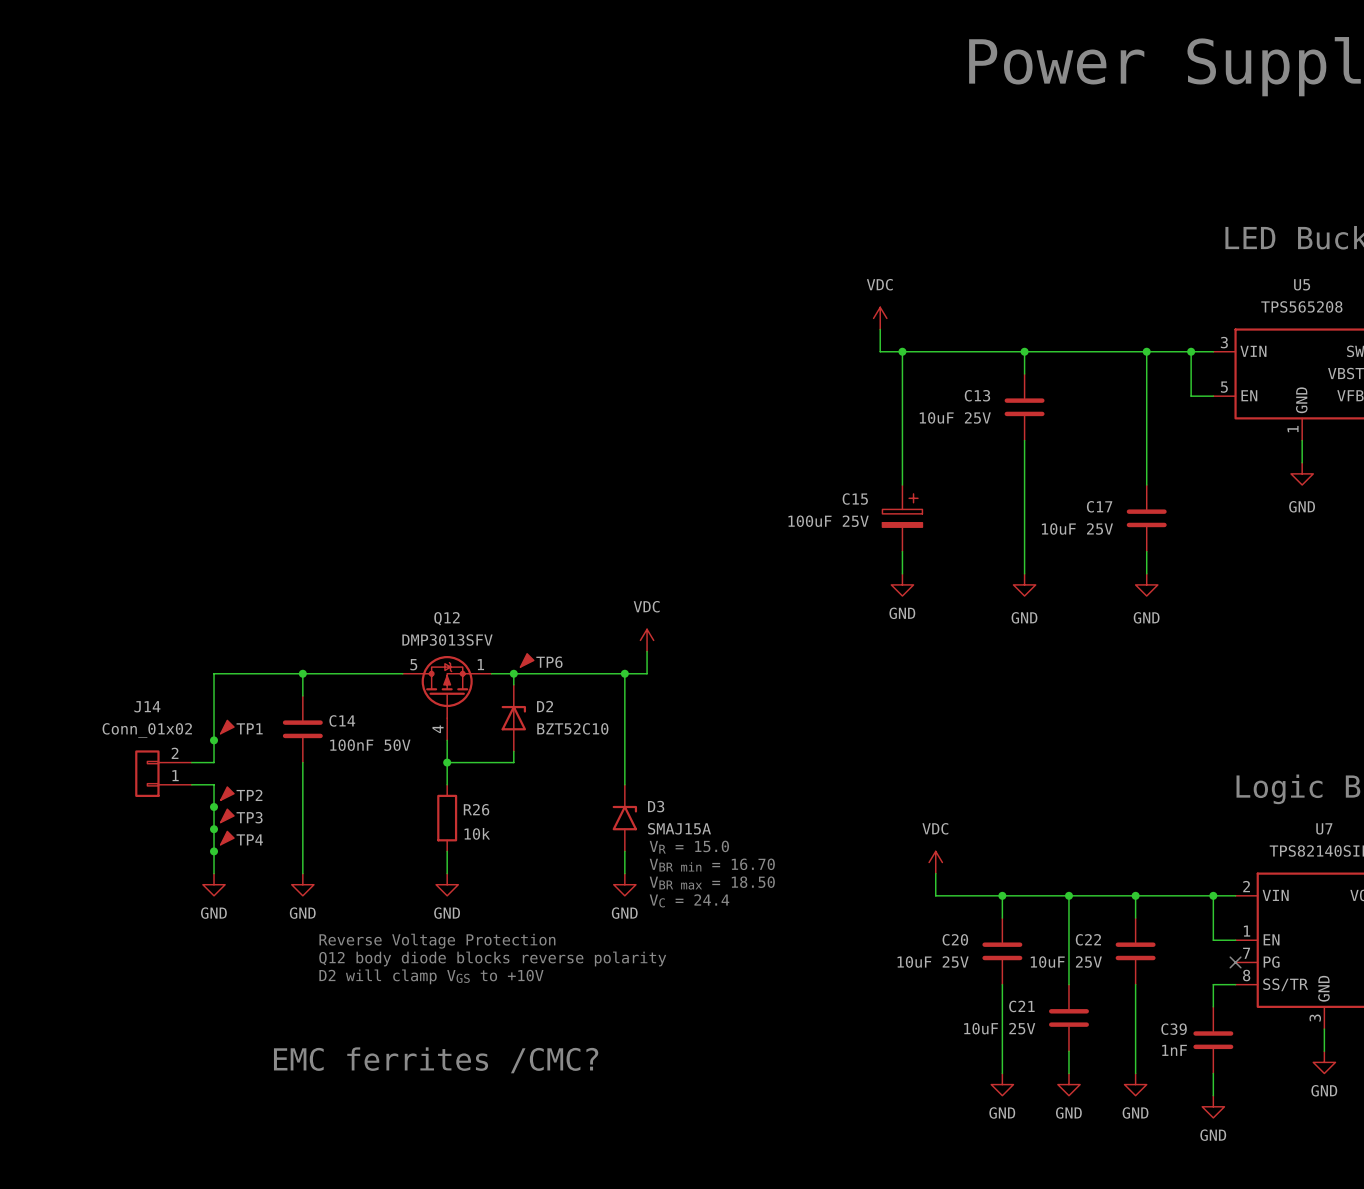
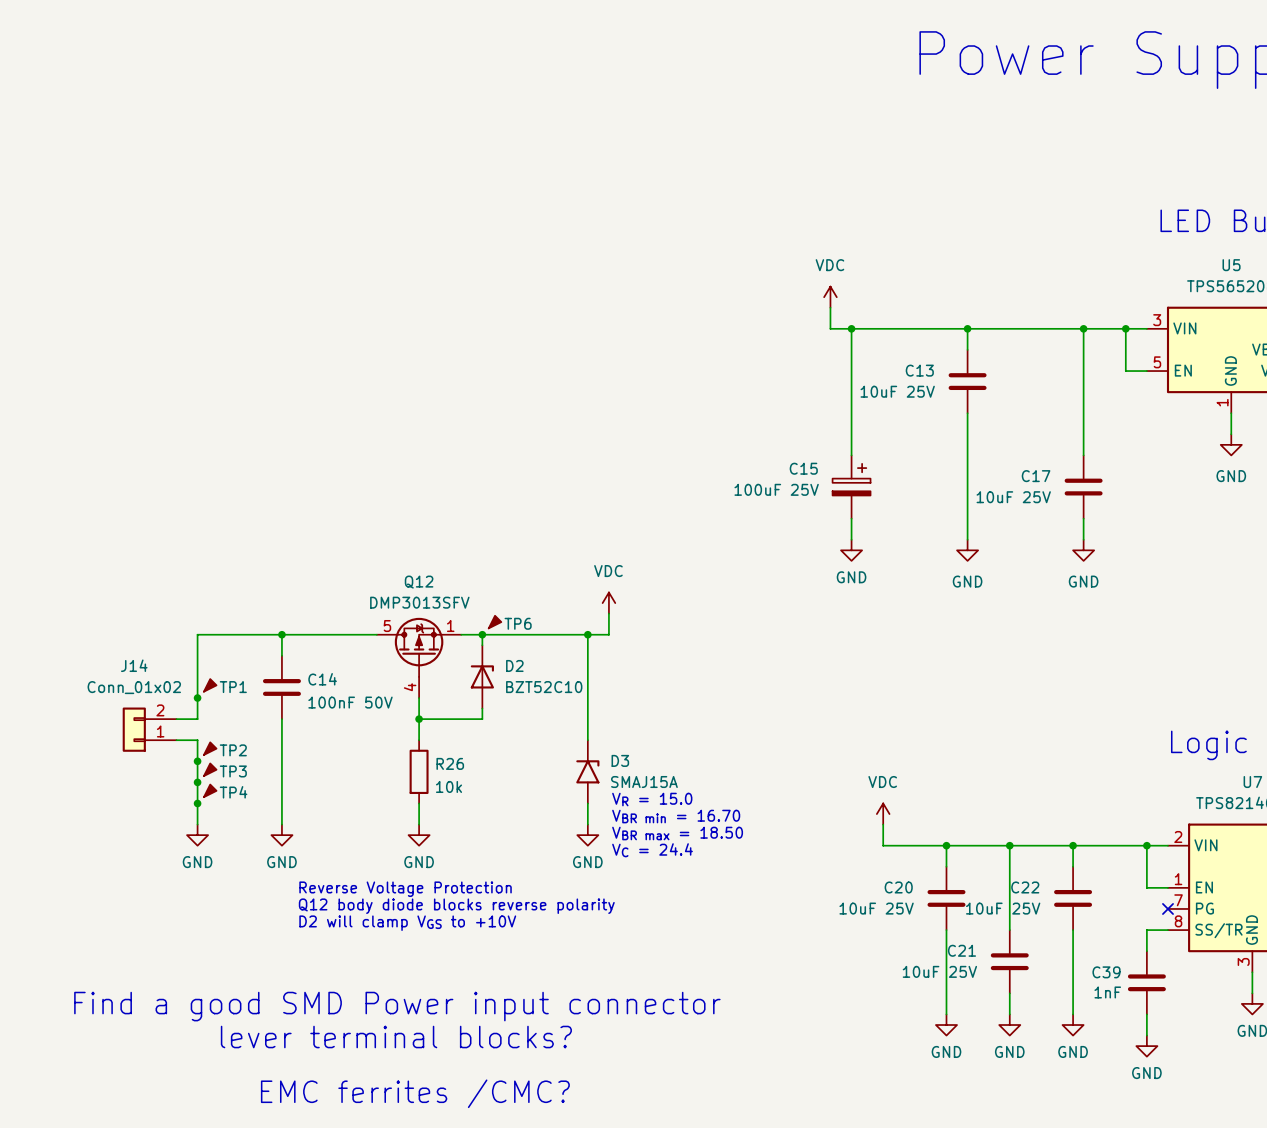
text position: EMC ferrites /CMC? (436, 1060) -> EMC ferrites /CMC? (415, 1093)
text: none -> Find a good SMD Power input connector (397, 1006)
text: none -> lever terminal blocks? (396, 1037)

